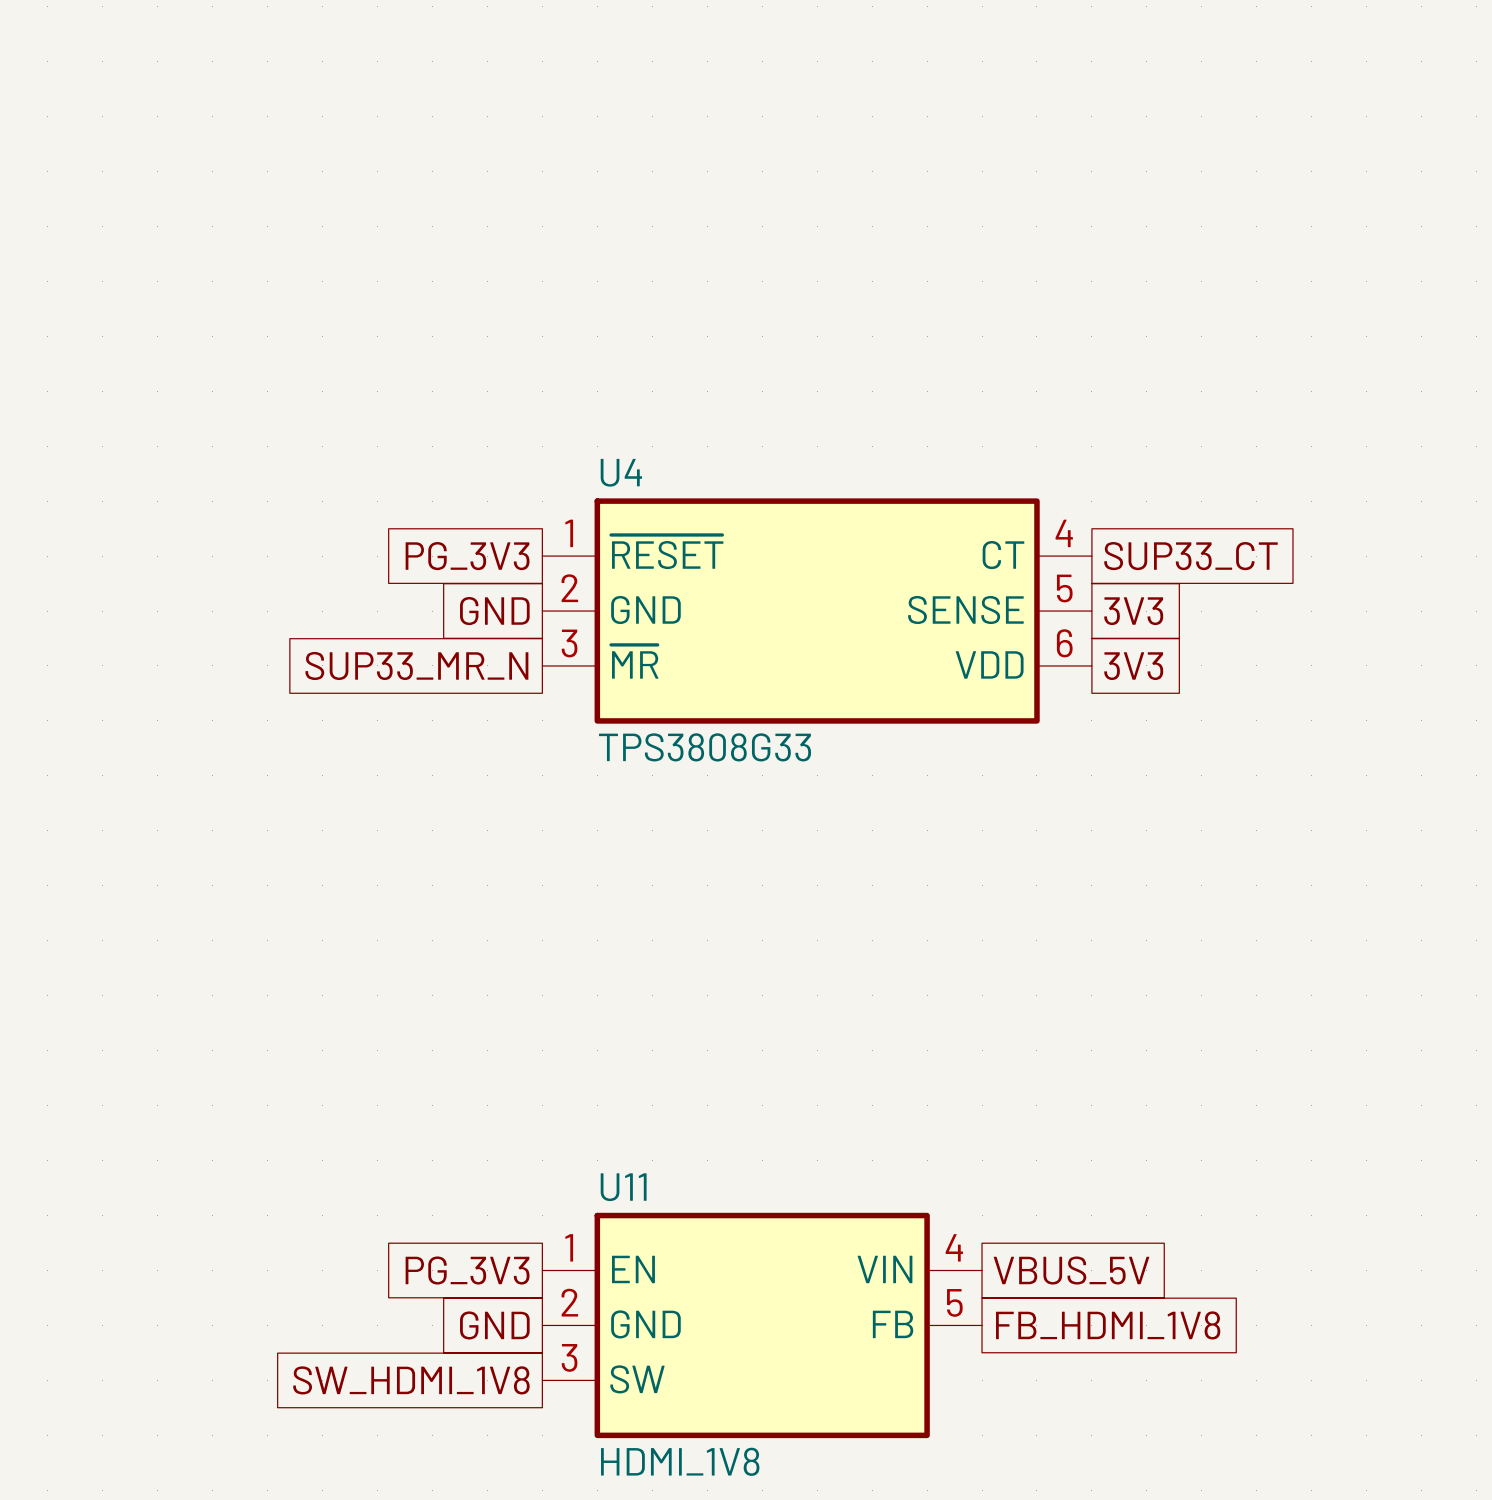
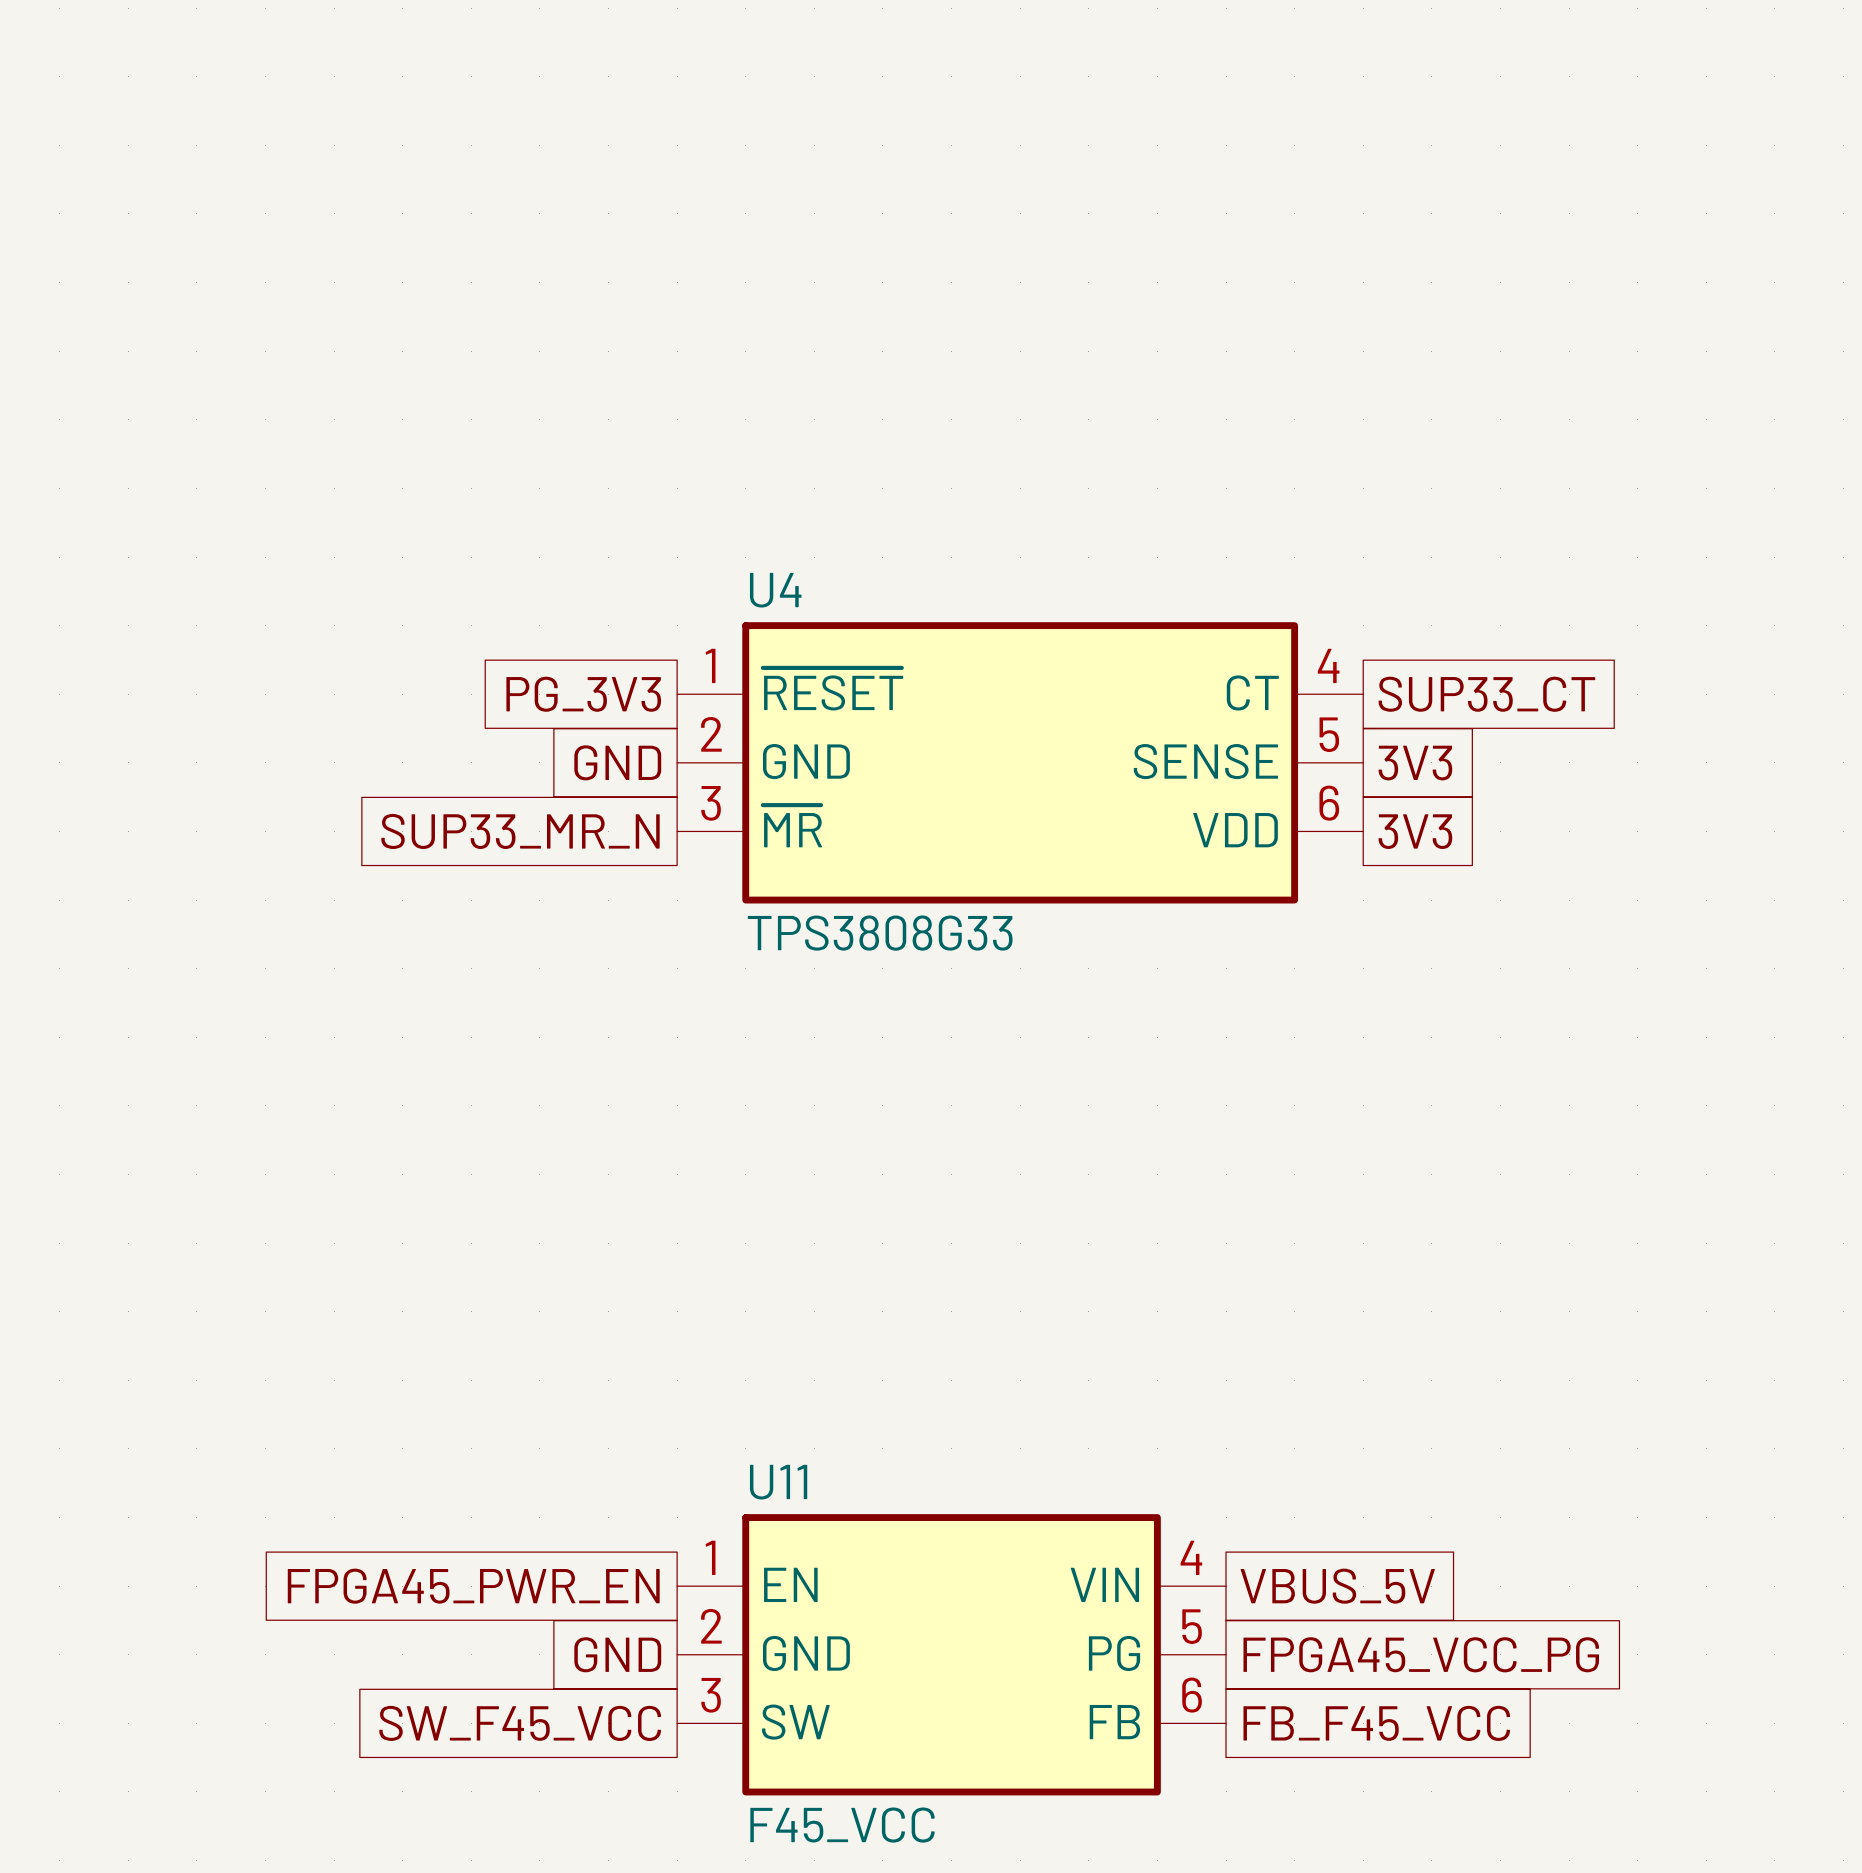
U11 symbol: [542, 1212, 983, 1439] -> [677, 1514, 1227, 1796]
global label: PG_3V3 (467, 1270) -> FPGA45_PWR_EN (473, 1586)
global label: FB_HDMI_1V8 (1108, 1325) -> FPGA45_VCC_PG (1421, 1654)
global label: SW_HDMI_1V8 (411, 1380) -> SW_F45_VCC (520, 1723)
global label: none -> FB_F45_VCC (1376, 1723)
U11 value: HDMI_1V8 (680, 1461) -> F45_VCC (842, 1825)

